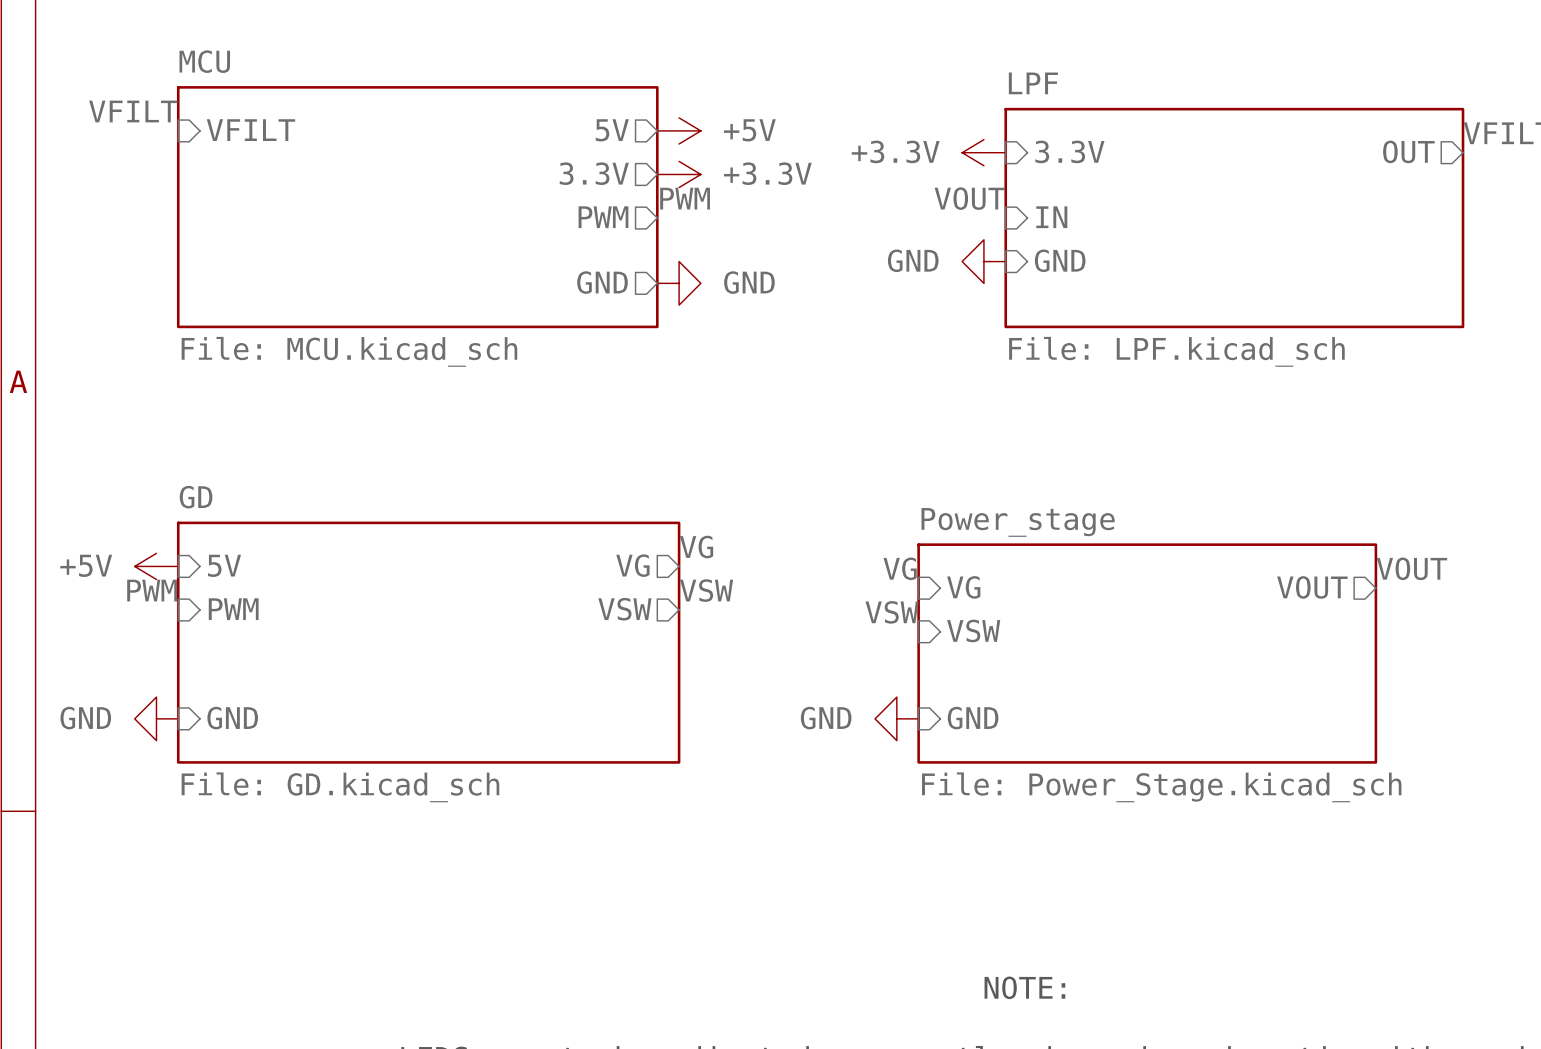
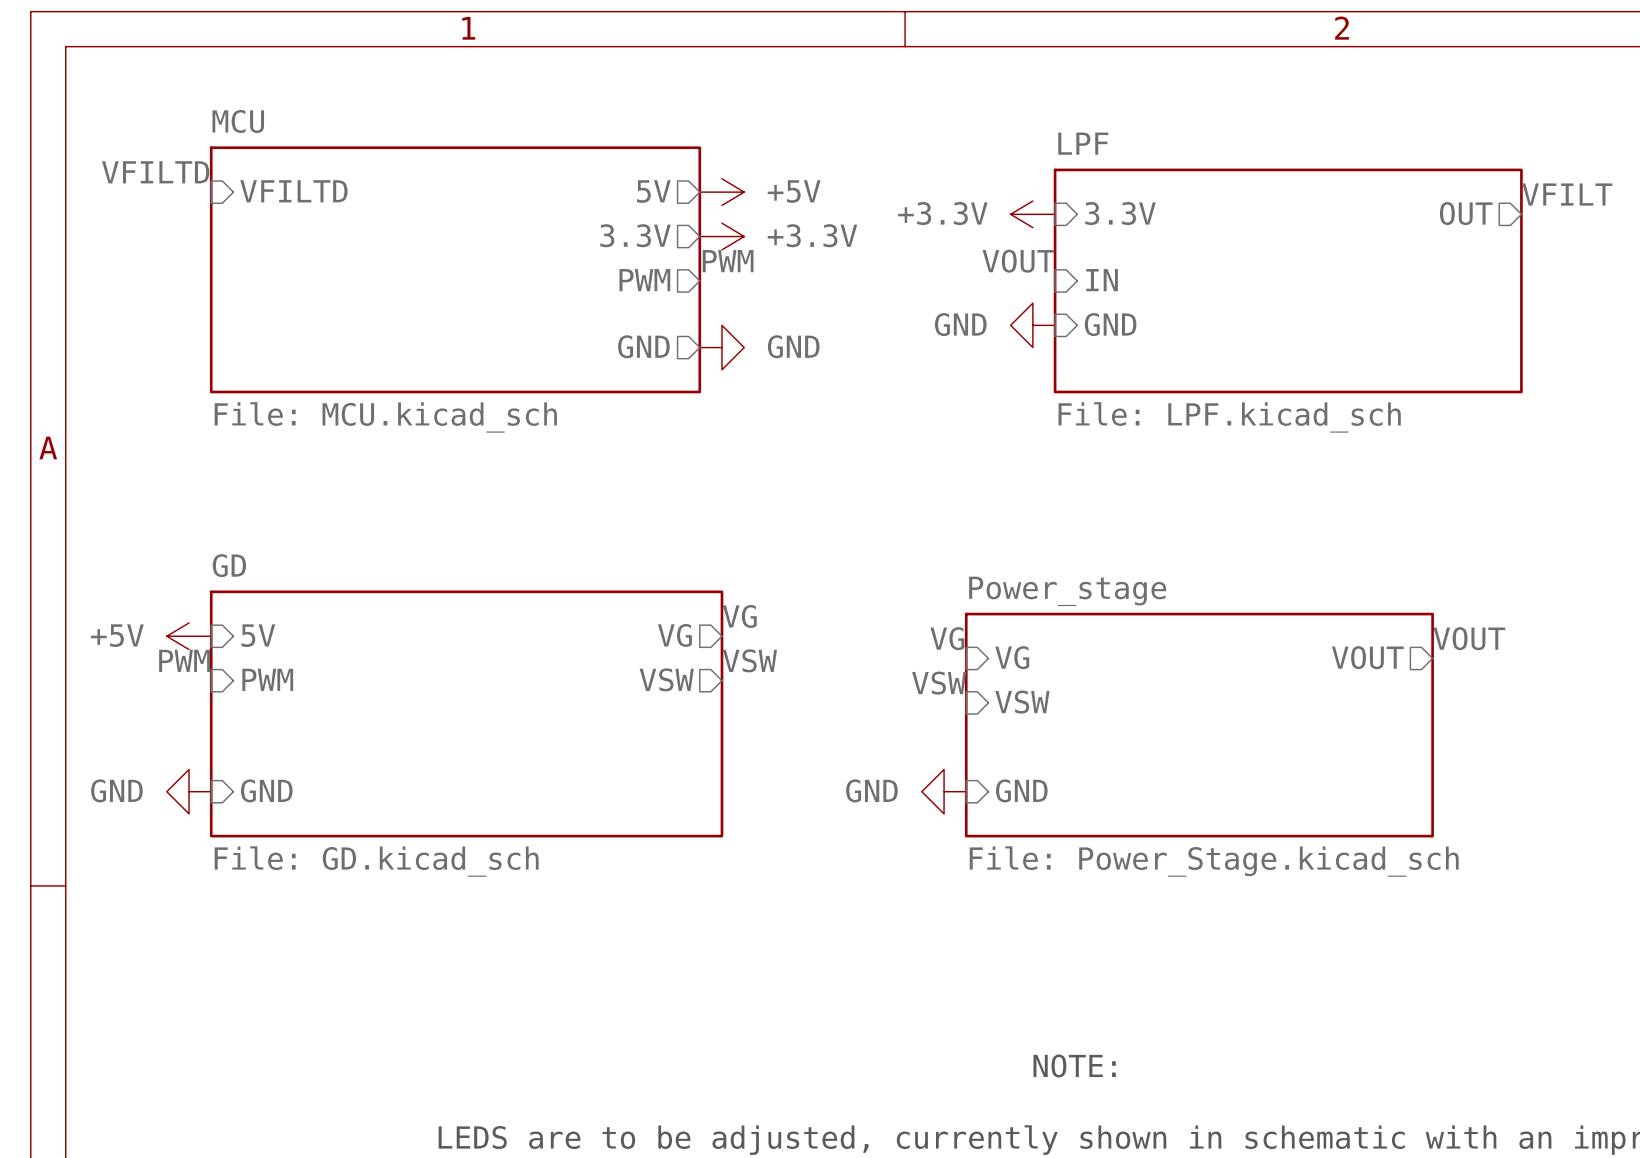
label: VFILT (133, 111) -> VFILTD (155, 172)
sheet pin: VFILT (250, 130) -> VFILTD (293, 191)

